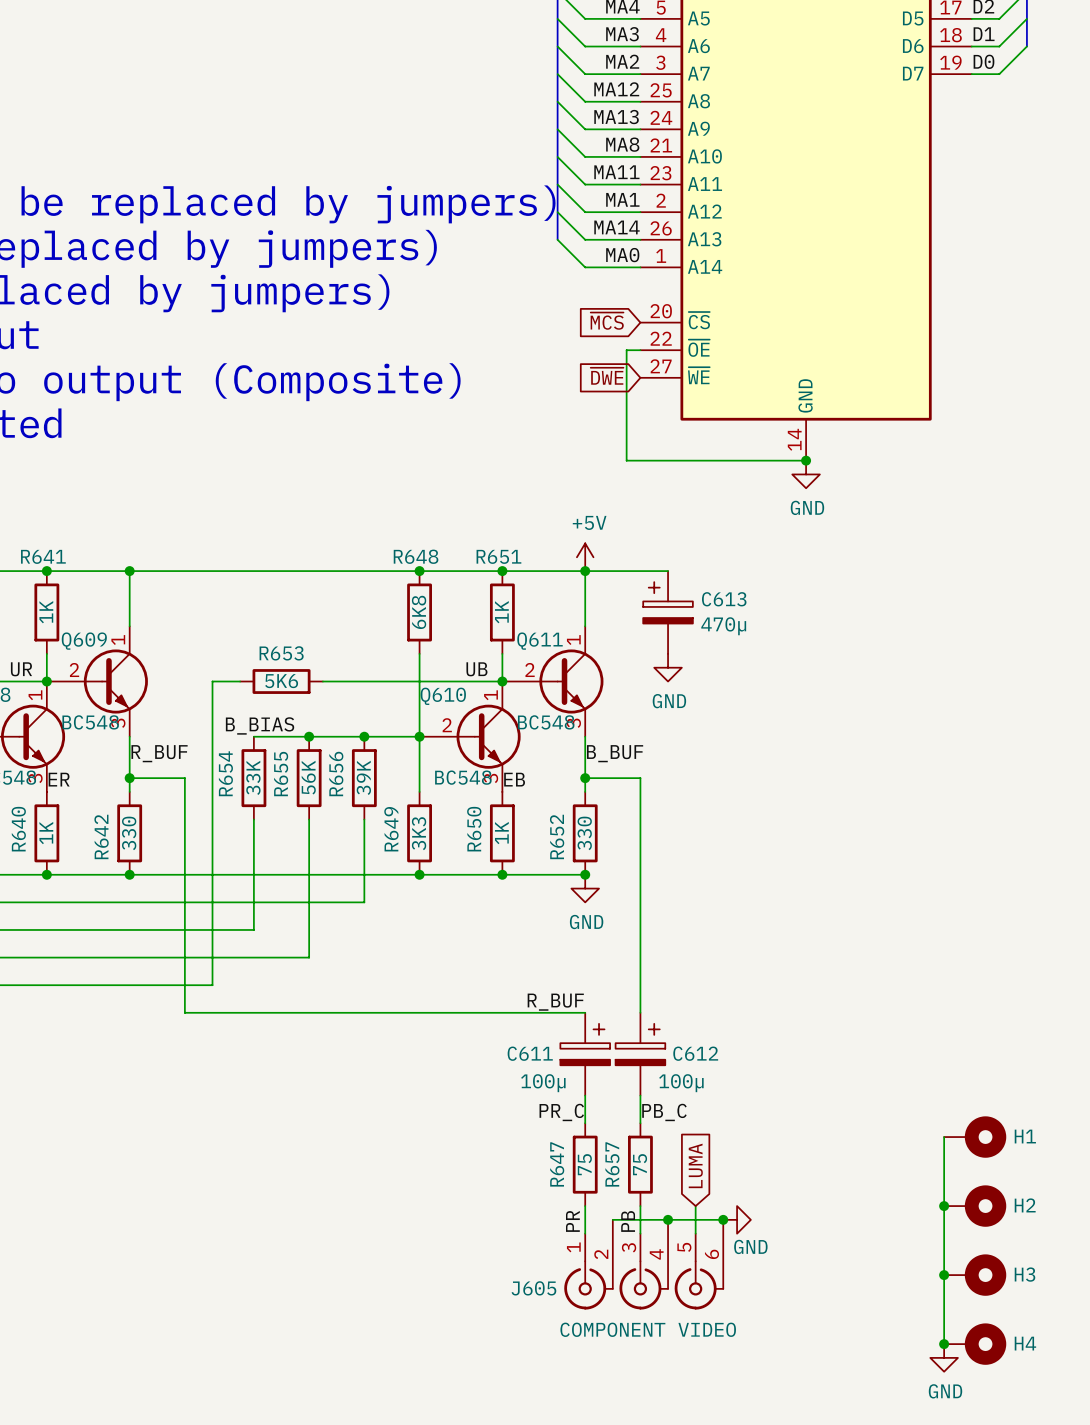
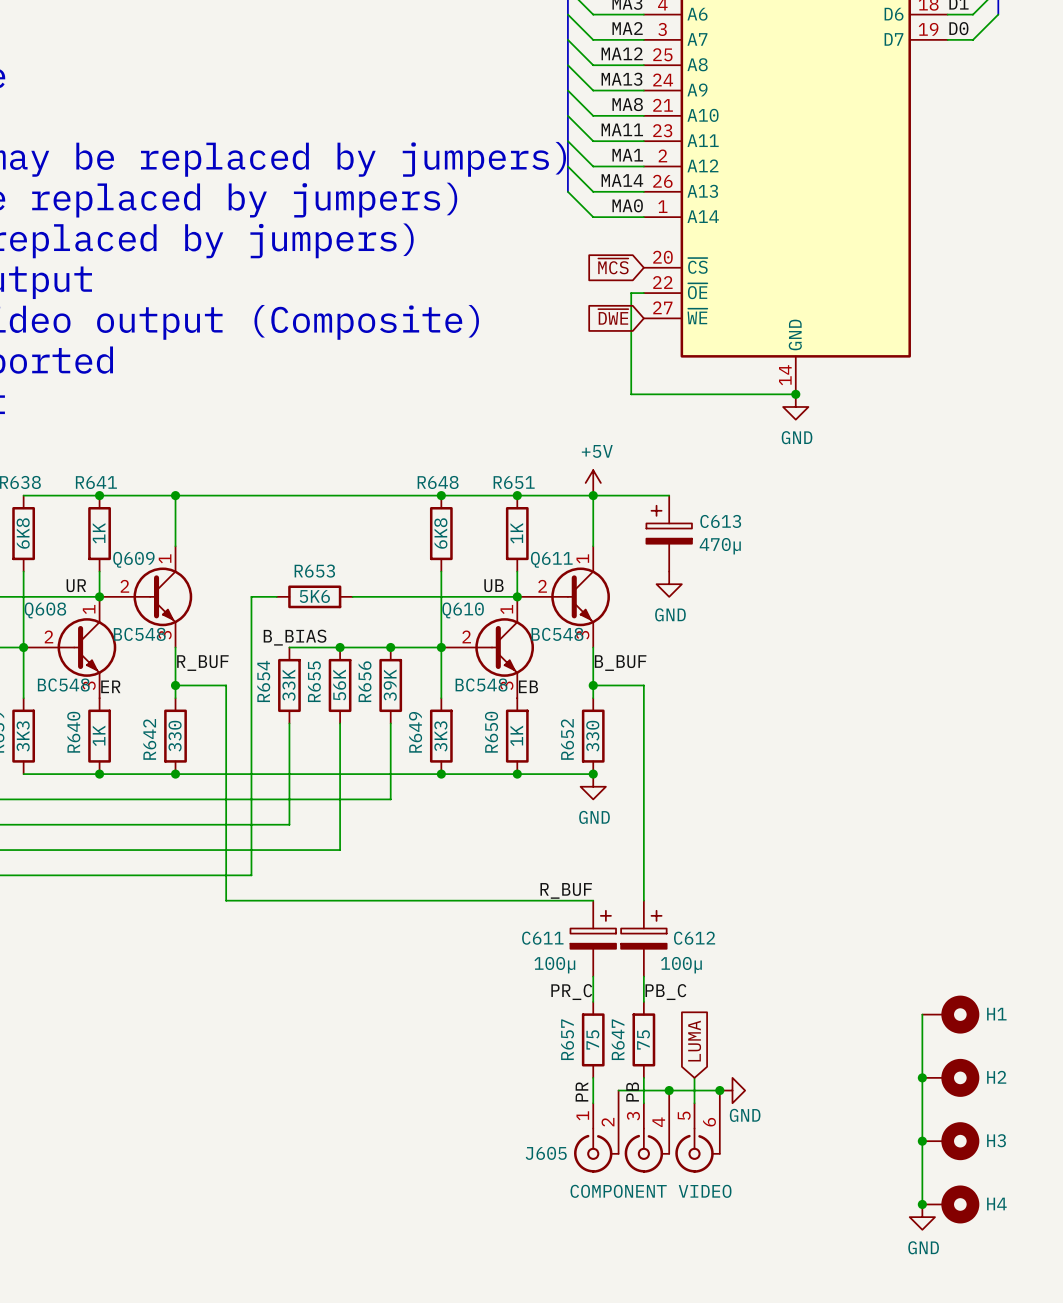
R647 name: R647 (557, 1164) -> R657 (567, 1039)
R657 name: R657 (612, 1164) -> R647 (618, 1039)

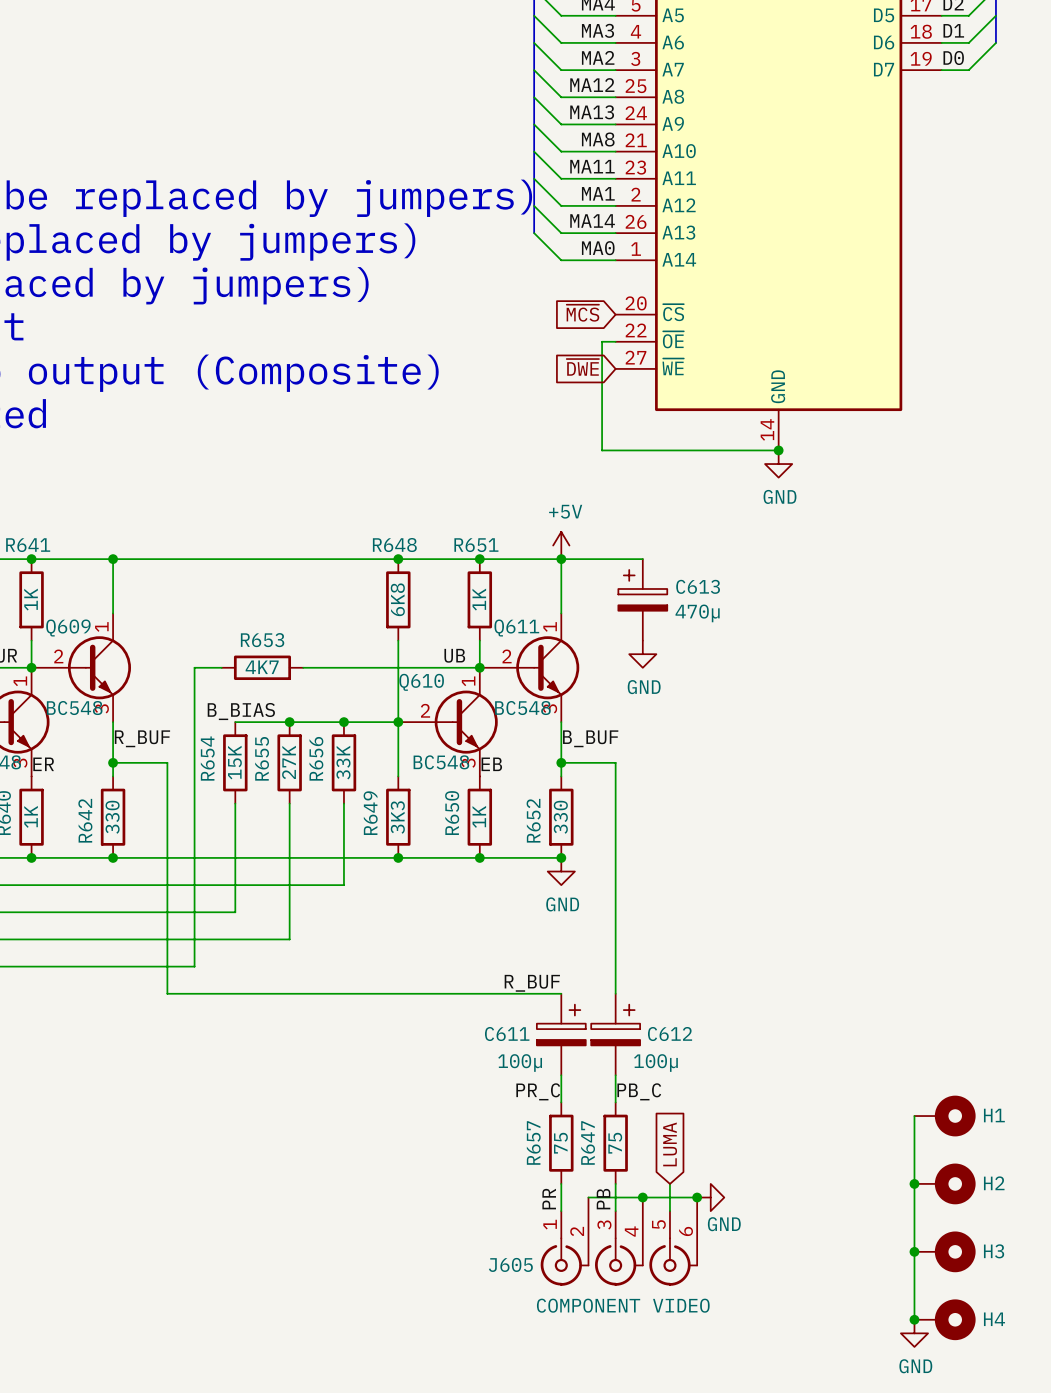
R653 value: 5K6 (314, 596) -> 4K7 (262, 667)
R654 value: 33K (288, 685) -> 15K (234, 762)
R655 value: 56K (339, 685) -> 27K (289, 762)
R656 value: 39K (390, 685) -> 33K (343, 762)

